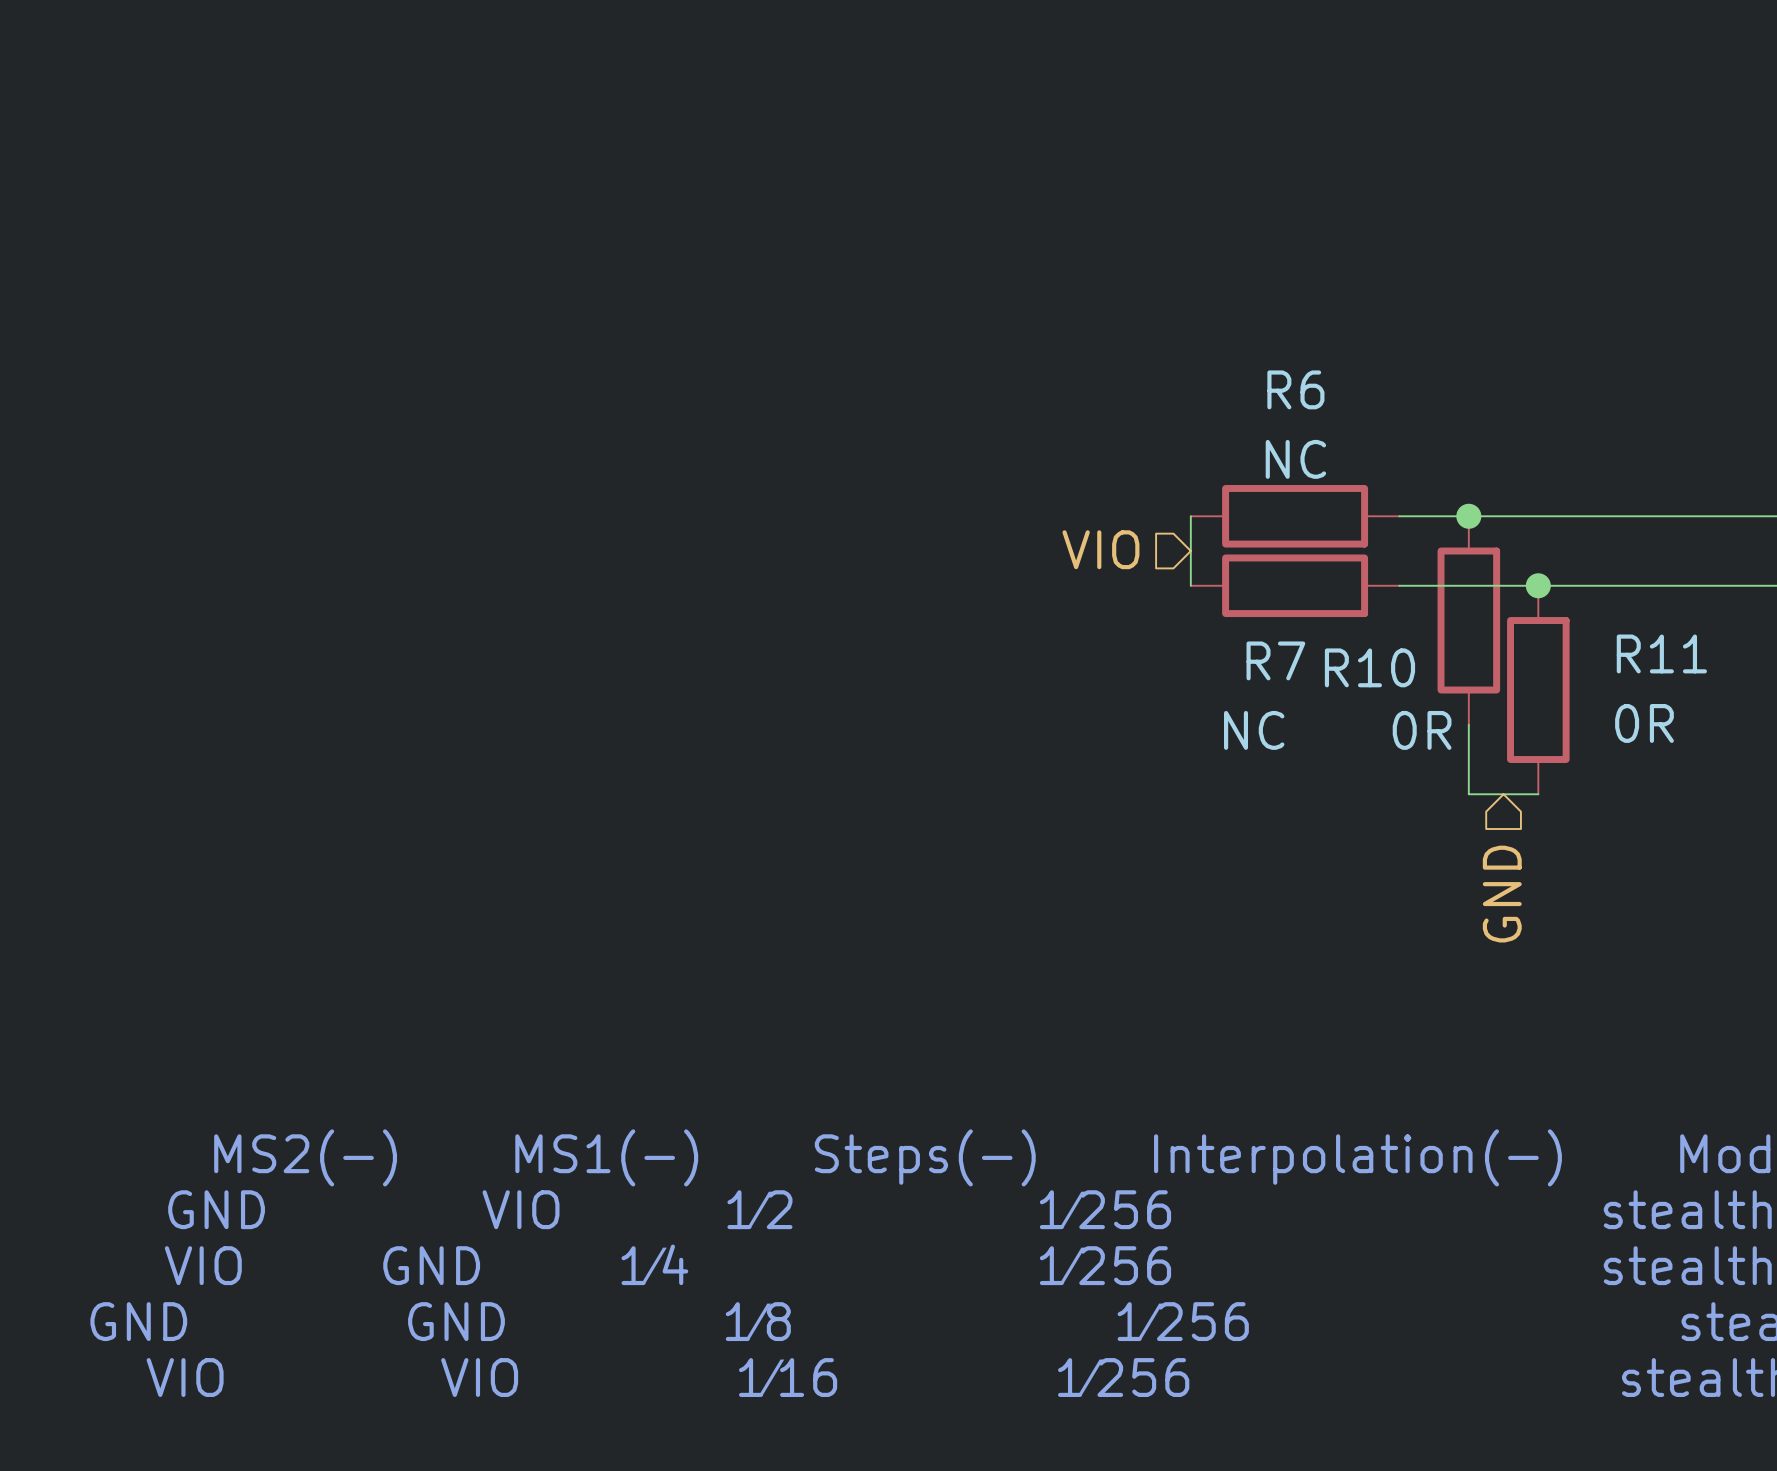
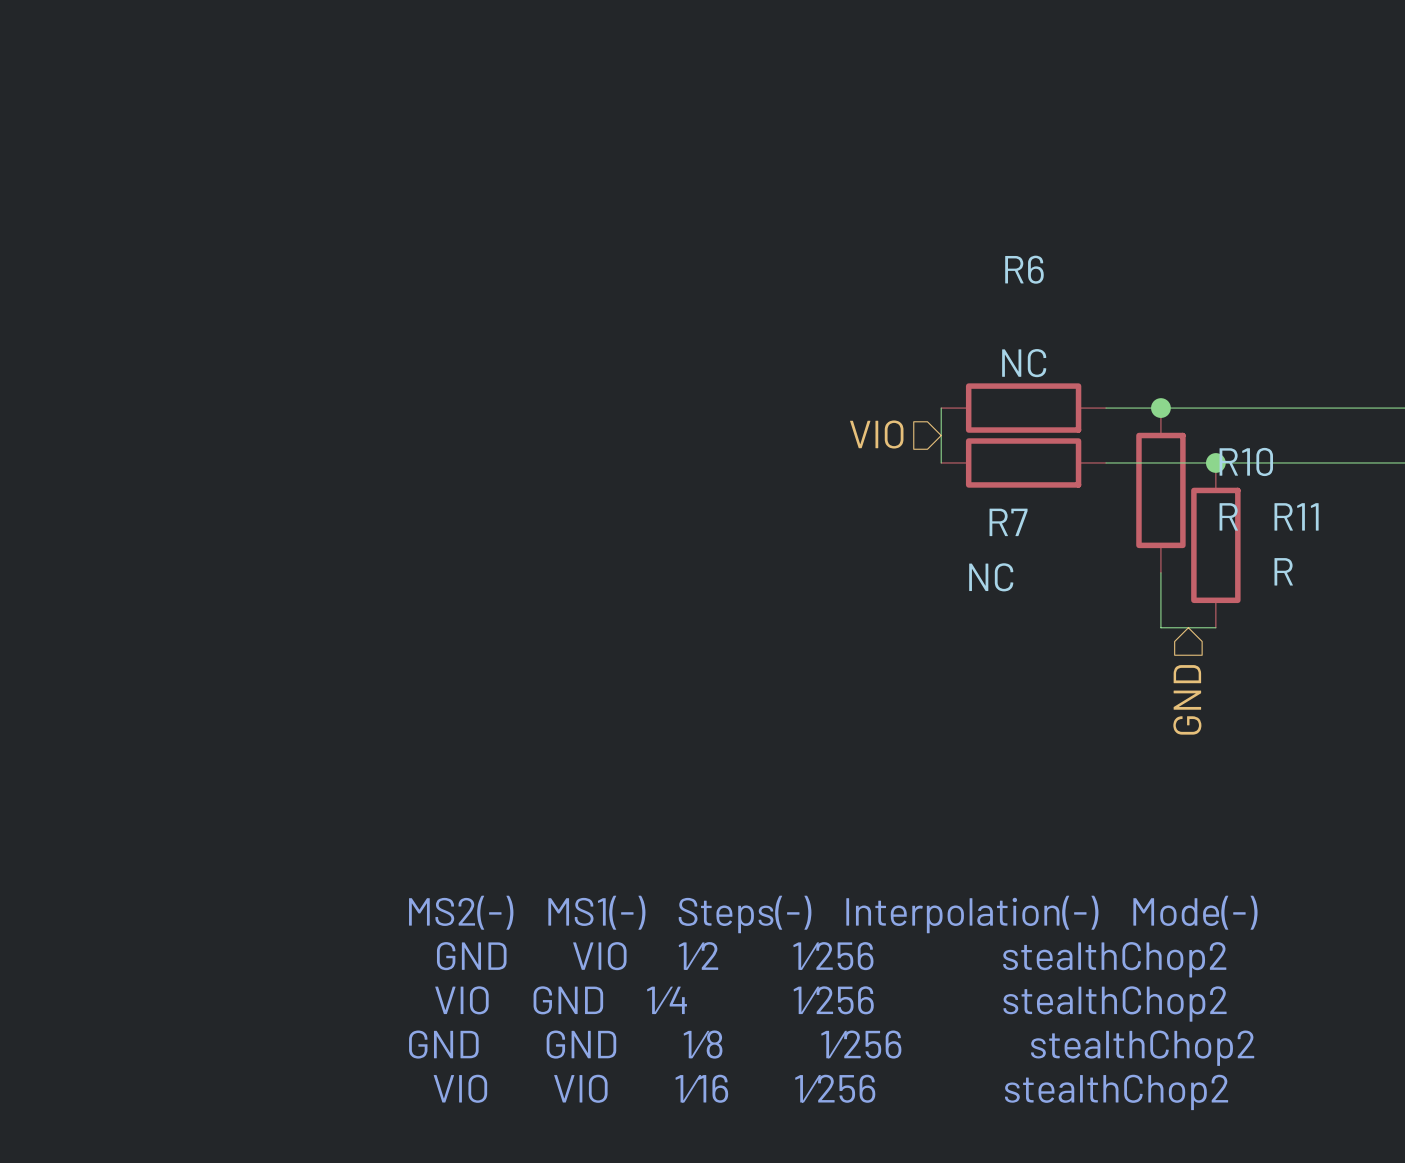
R6 name position: R6 (1295, 389) -> R6 (1024, 269)
R10 name position: R10 (1369, 667) -> R10 (1246, 461)
R11 value: 0R (1644, 723) -> R (1283, 571)
R10 value: 0R (1422, 730) -> R (1228, 516)

